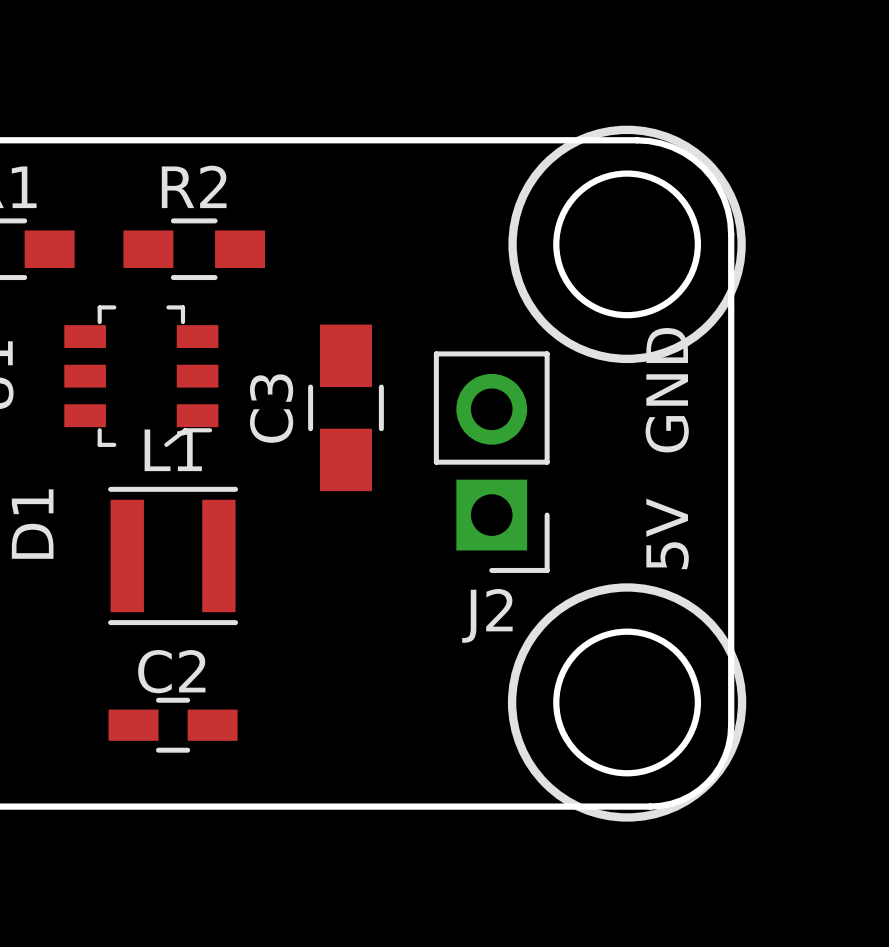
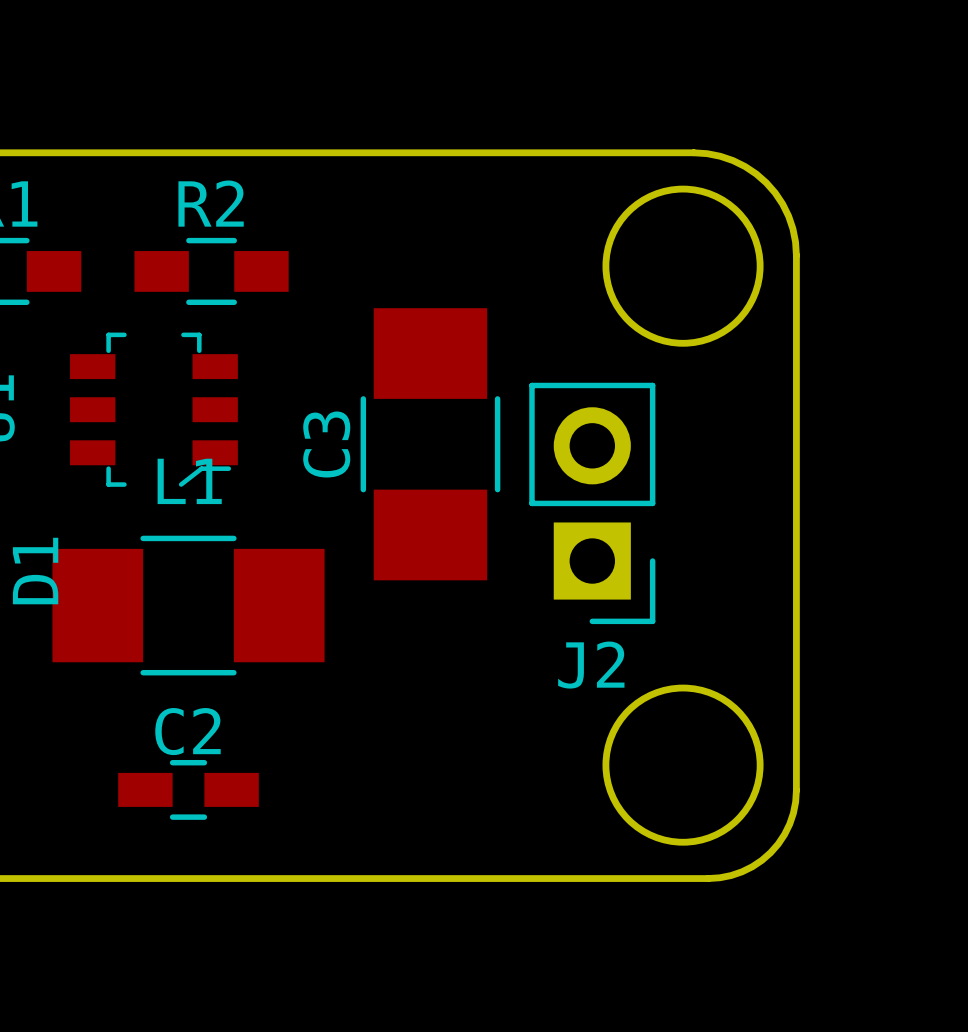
drawing: [508, 125, 746, 364] -> none
C3 footprint: [308, 324, 384, 492] -> [360, 308, 501, 581]
text: GND (667, 390) -> none
J2 position: (491, 462) -> (592, 503)
L1 footprint: [108, 486, 239, 626] -> [52, 535, 325, 676]
text: 5V (667, 533) -> none
drawing: [507, 583, 747, 822] -> none

